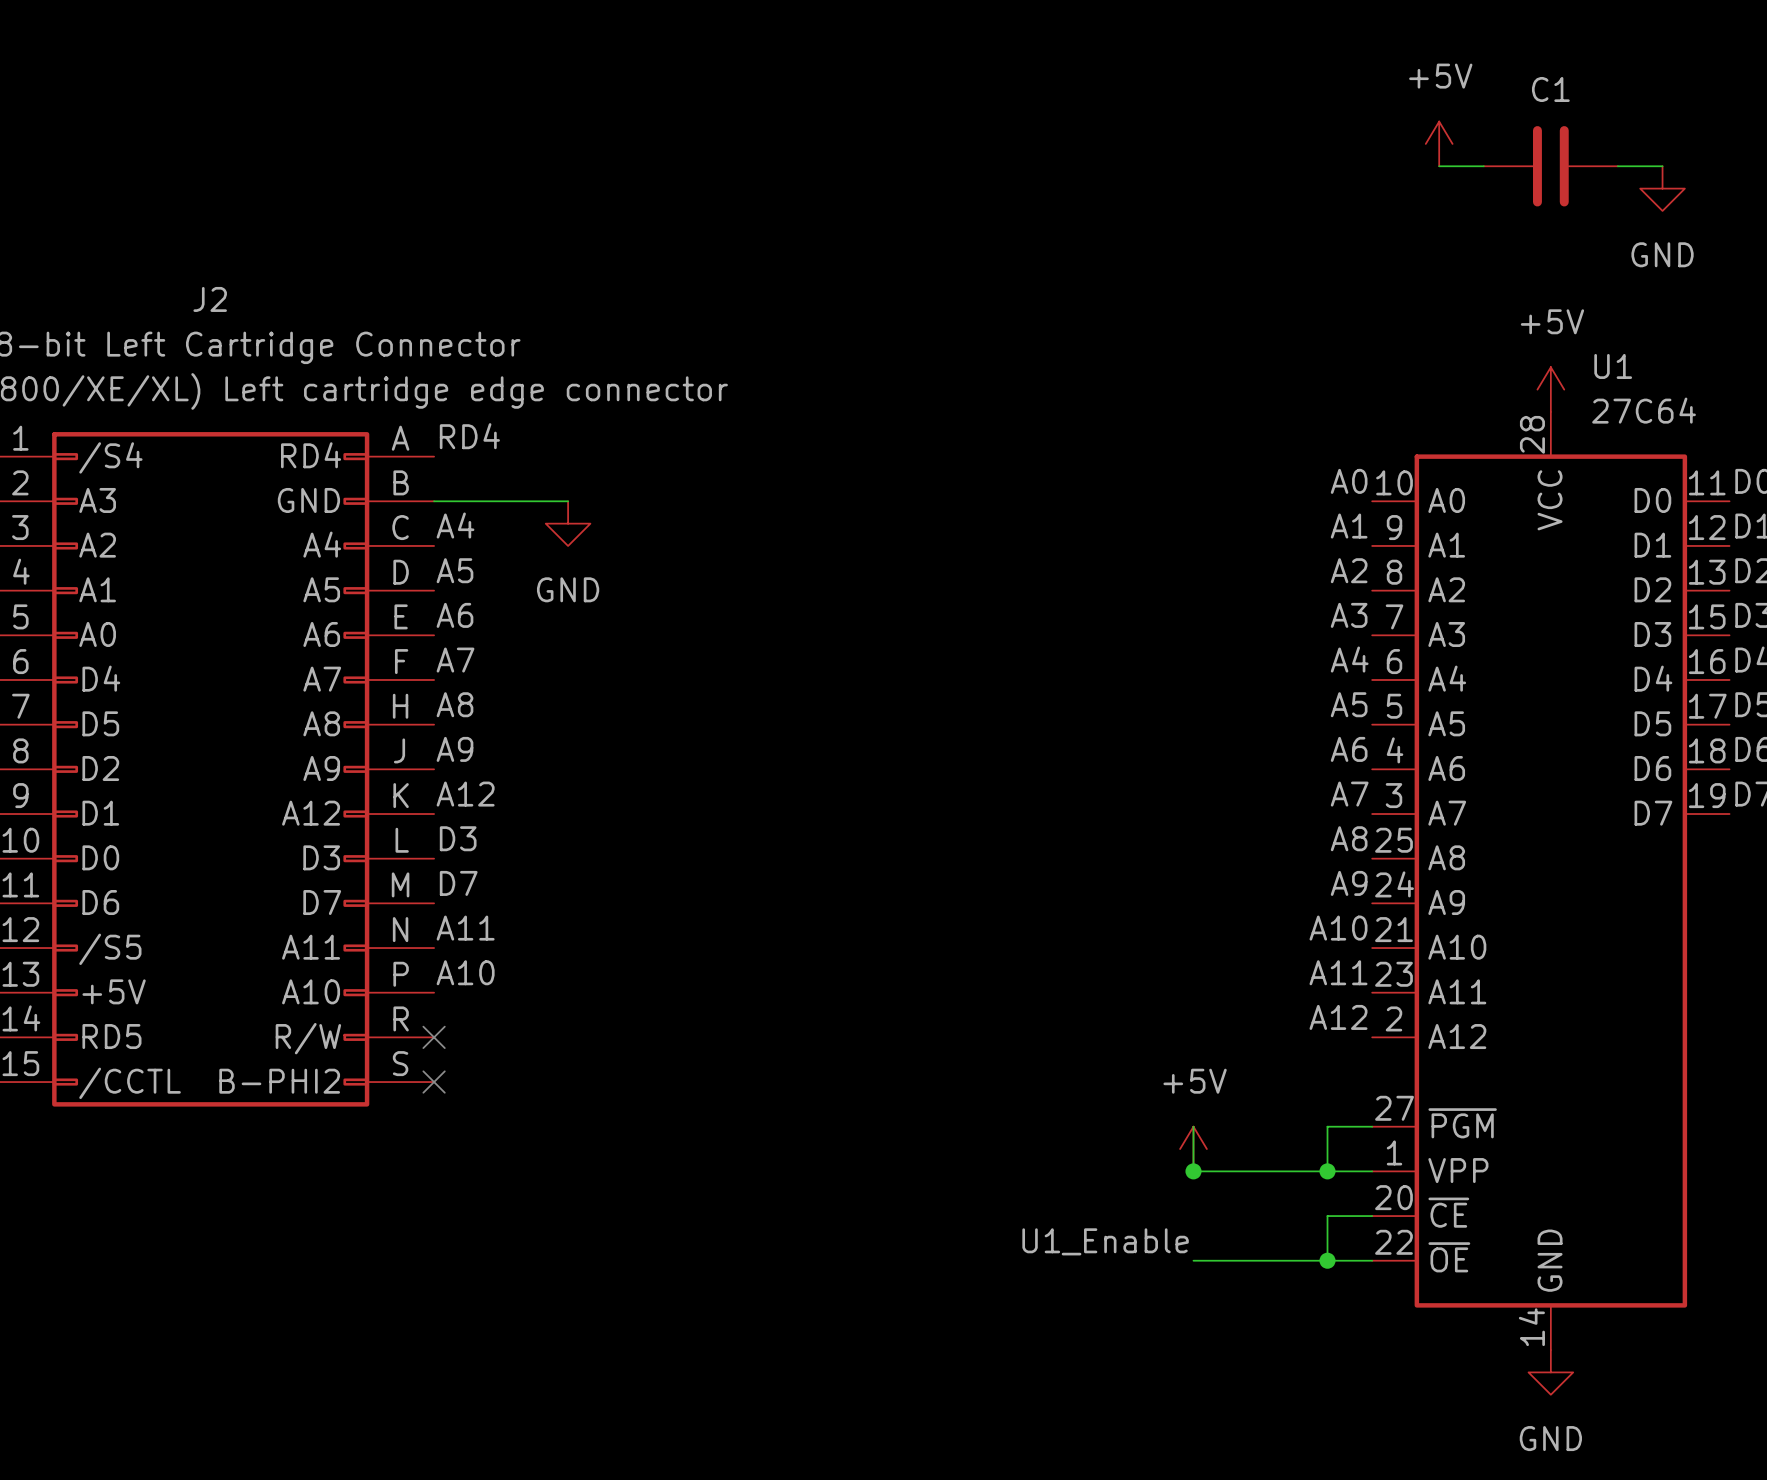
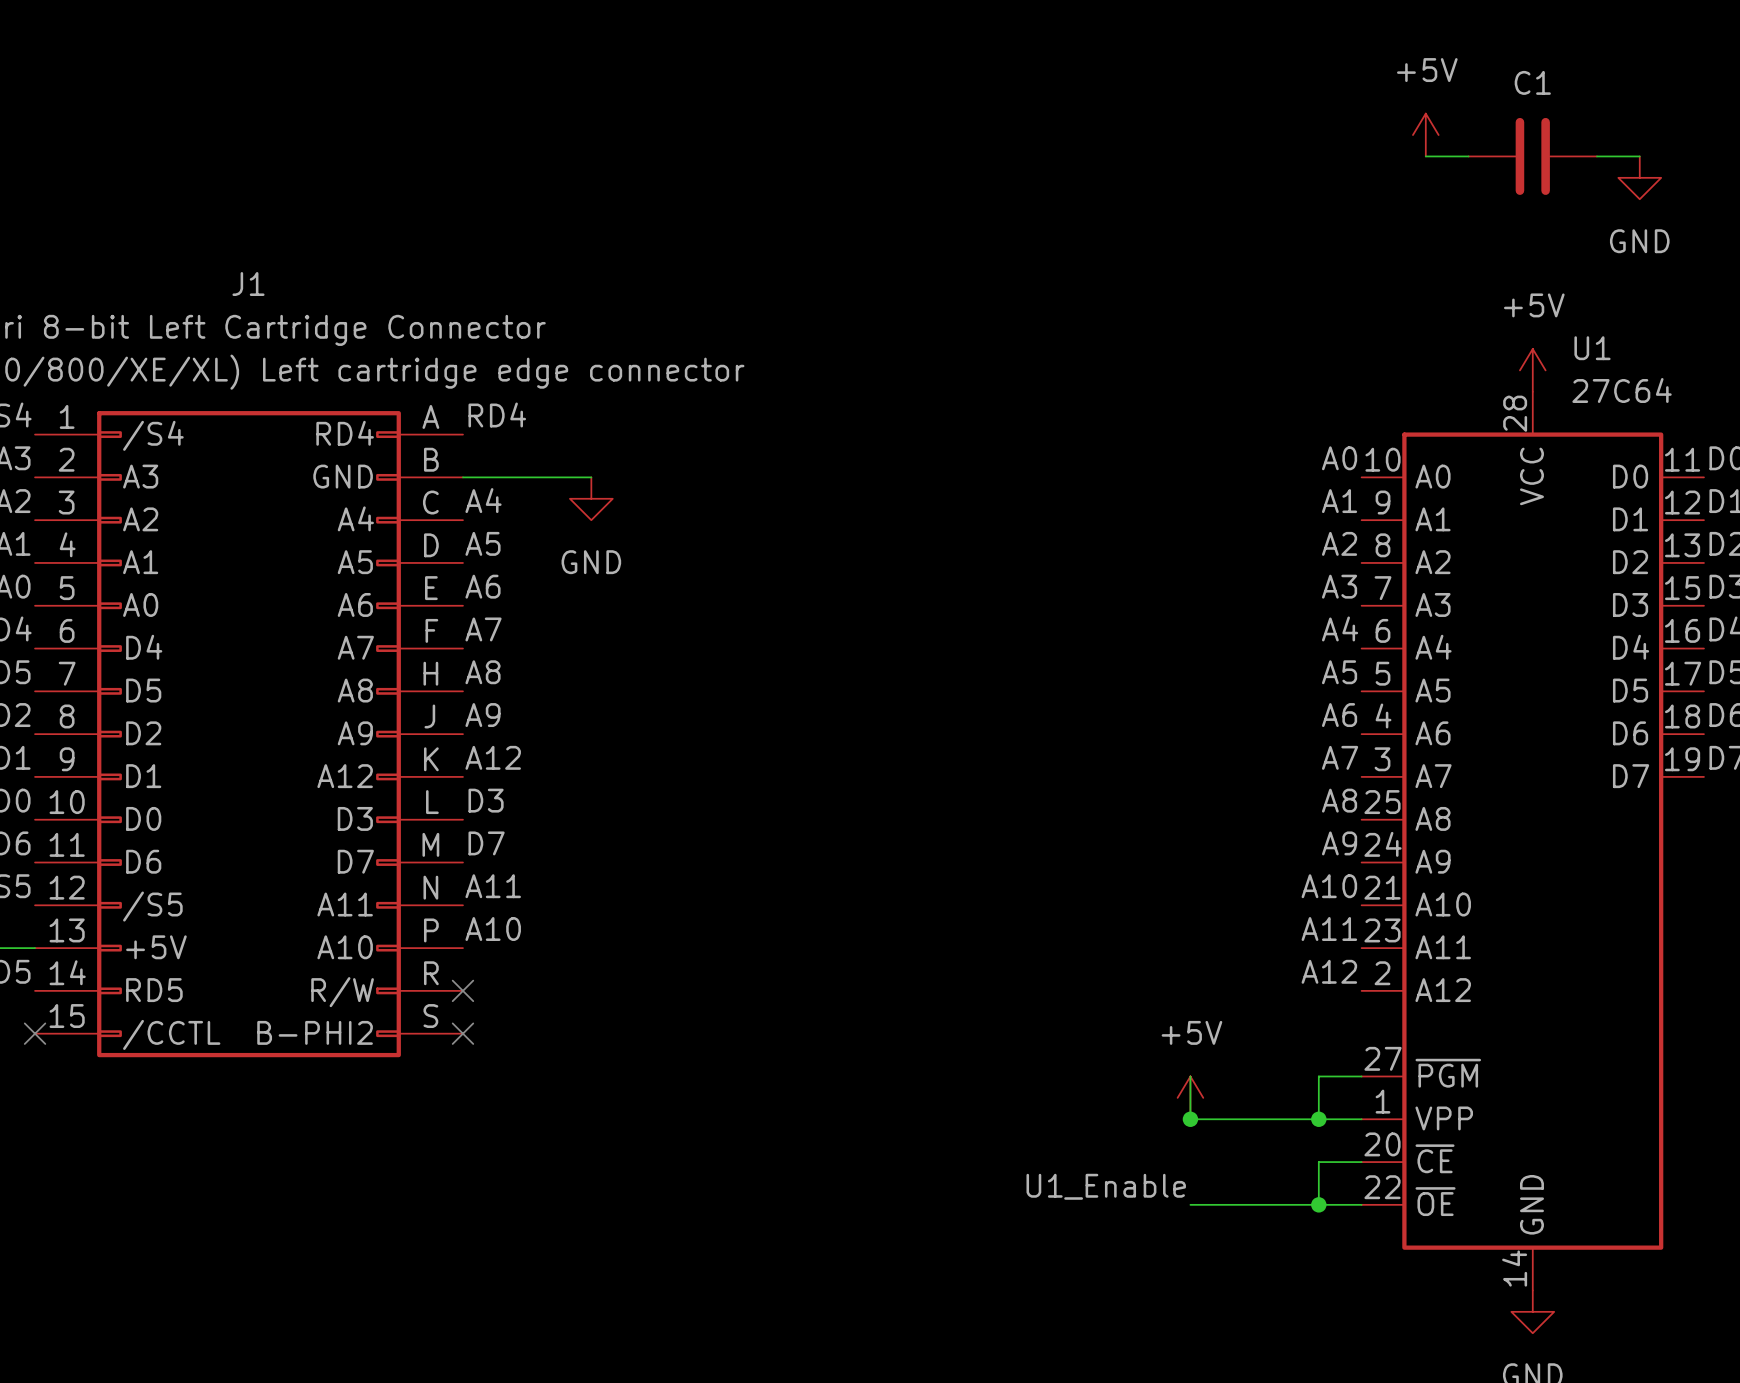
J2 name: J2 (210, 299) -> J1 (248, 284)

